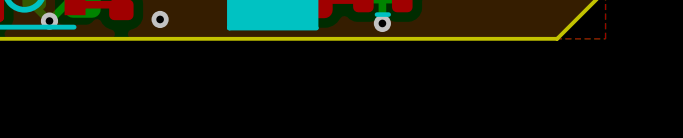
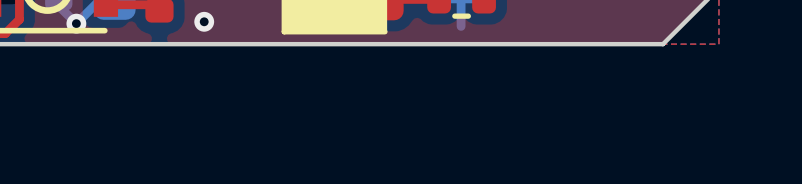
via: (382, 23) -> none

